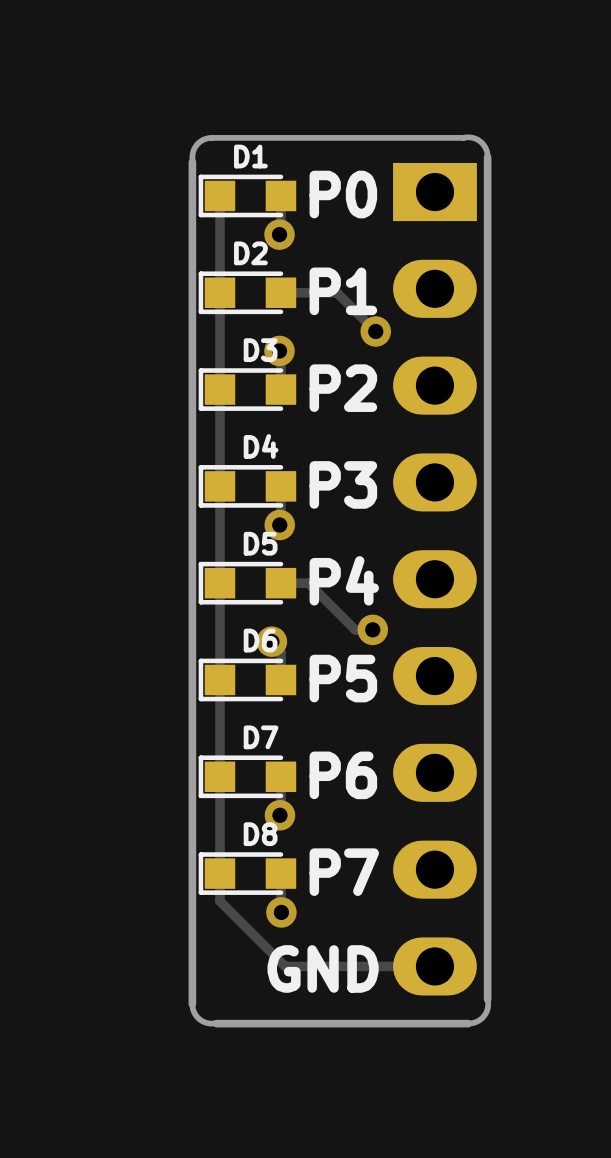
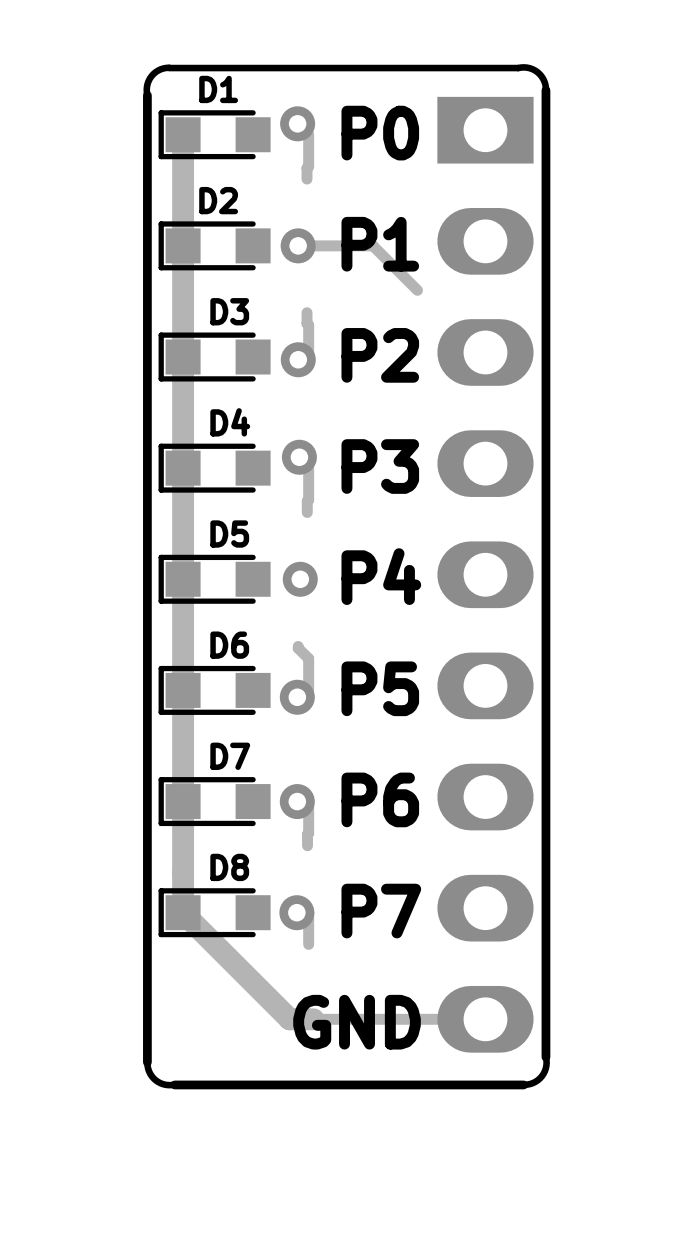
board edge: none -> (168, 67) (160, 69) (153, 74) (148, 81) (146, 89) (147, 1062)
board edge: (211, 137) (204, 139) (196, 145) (192, 154) (192, 161) -> (229, 68) (169, 68)
board edge: (192, 162) (192, 1004) (193, 1011) (199, 1019) (208, 1023) (216, 1023) -> (174, 1084) (234, 1084)
via: none -> (297, 123)
track: (219, 195) (219, 901) (285, 966) -> (183, 134) (183, 912) (289, 1019) (313, 1019)
D1 position: (247, 195) -> (214, 134)
via: (279, 234) -> none
D2 position: (247, 292) -> (214, 245)
via: none -> (298, 245)
via: (375, 331) -> none
via: (279, 350) -> none
D3 position: (247, 389) -> (214, 357)
via: none -> (298, 359)
via: none -> (299, 457)
D4 position: (247, 486) -> (214, 468)
via: (279, 525) -> none
D5 position: (247, 583) -> (214, 579)
via: none -> (300, 579)
track: (280, 583) (308, 583) (355, 629) (372, 629) -> none
via: (372, 629) -> none
via: (271, 641) -> none
D6 position: (247, 679) -> (214, 690)
via: none -> (297, 697)
D7 position: (247, 776) -> (214, 801)
via: none -> (297, 801)
via: (279, 815) -> none
D8 position: (247, 873) -> (214, 912)
via: none -> (296, 912)
via: (281, 912) -> none
board edge: none -> (147, 1062) (149, 1071) (155, 1080) (166, 1084) (175, 1084)

